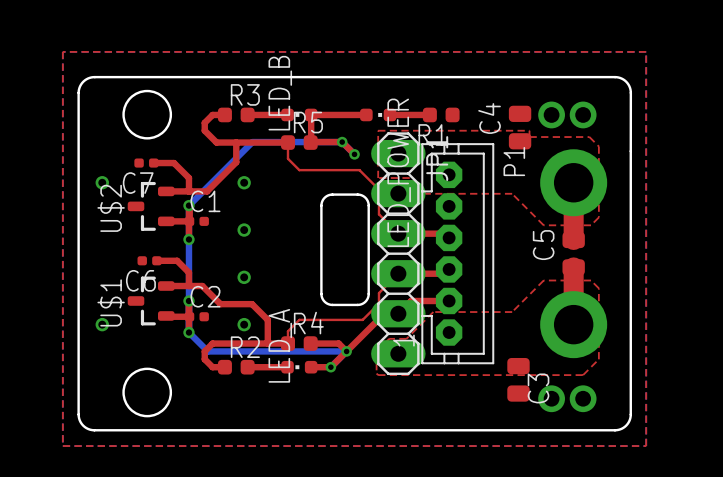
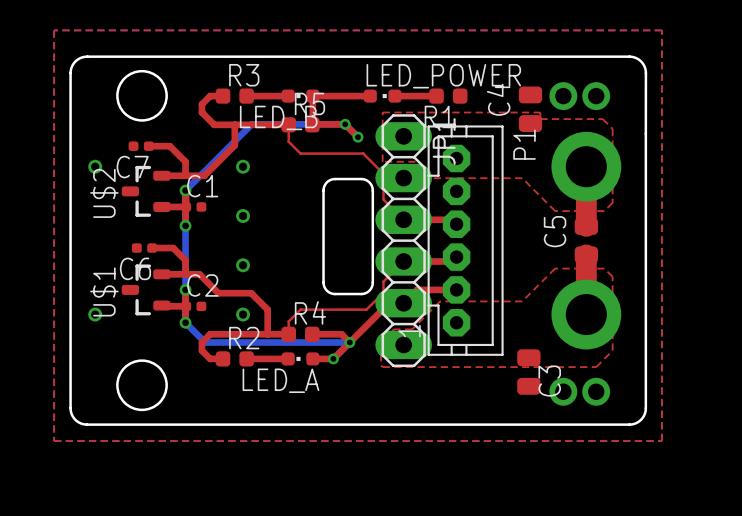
LED_B name rotation: 0° (280, 93) -> 90° clockwise (278, 117)
LED_POWER name rotation: 0° (399, 172) -> 90° clockwise (443, 76)
LED_A name rotation: 0° (280, 345) -> 90° clockwise (280, 380)

